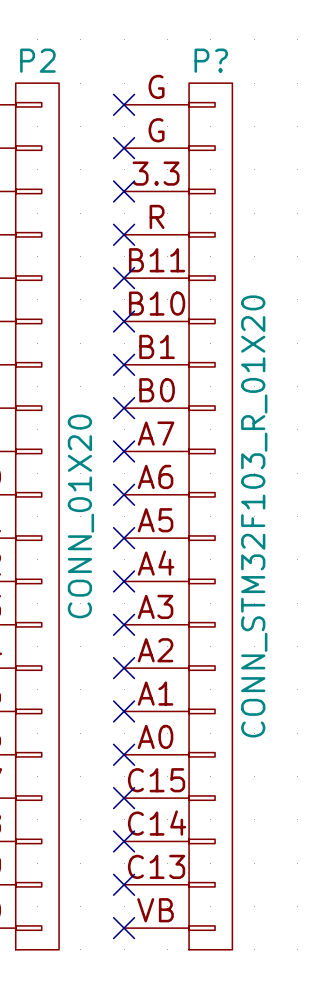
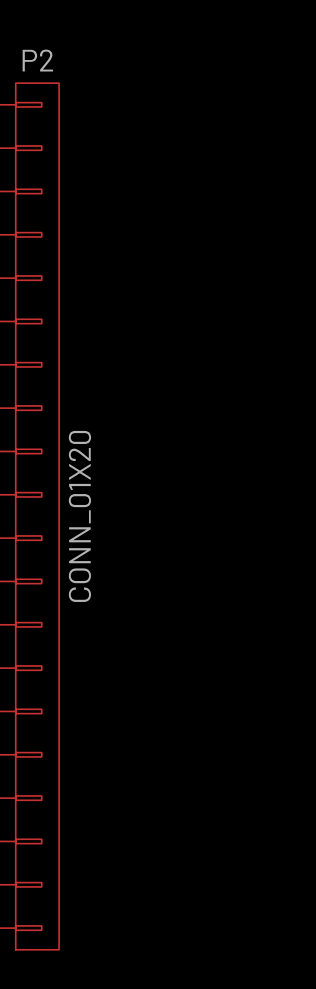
no-connect mark: (124, 104) -> none
no-connect mark: (124, 148) -> none
no-connect mark: (124, 191) -> none
no-connect mark: (124, 234) -> none
no-connect mark: (124, 278) -> none
no-connect mark: (124, 321) -> none
no-connect mark: (124, 364) -> none
no-connect mark: (124, 408) -> none
no-connect mark: (124, 451) -> none
no-connect mark: (124, 494) -> none
P?: CONN_STM32F103_R_01X20 (178, 516) -> none
no-connect mark: (124, 538) -> none
no-connect mark: (124, 581) -> none
no-connect mark: (124, 624) -> none
no-connect mark: (124, 668) -> none
no-connect mark: (124, 711) -> none
no-connect mark: (124, 754) -> none
no-connect mark: (124, 798) -> none
no-connect mark: (124, 841) -> none
no-connect mark: (124, 884) -> none
no-connect mark: (124, 928) -> none

